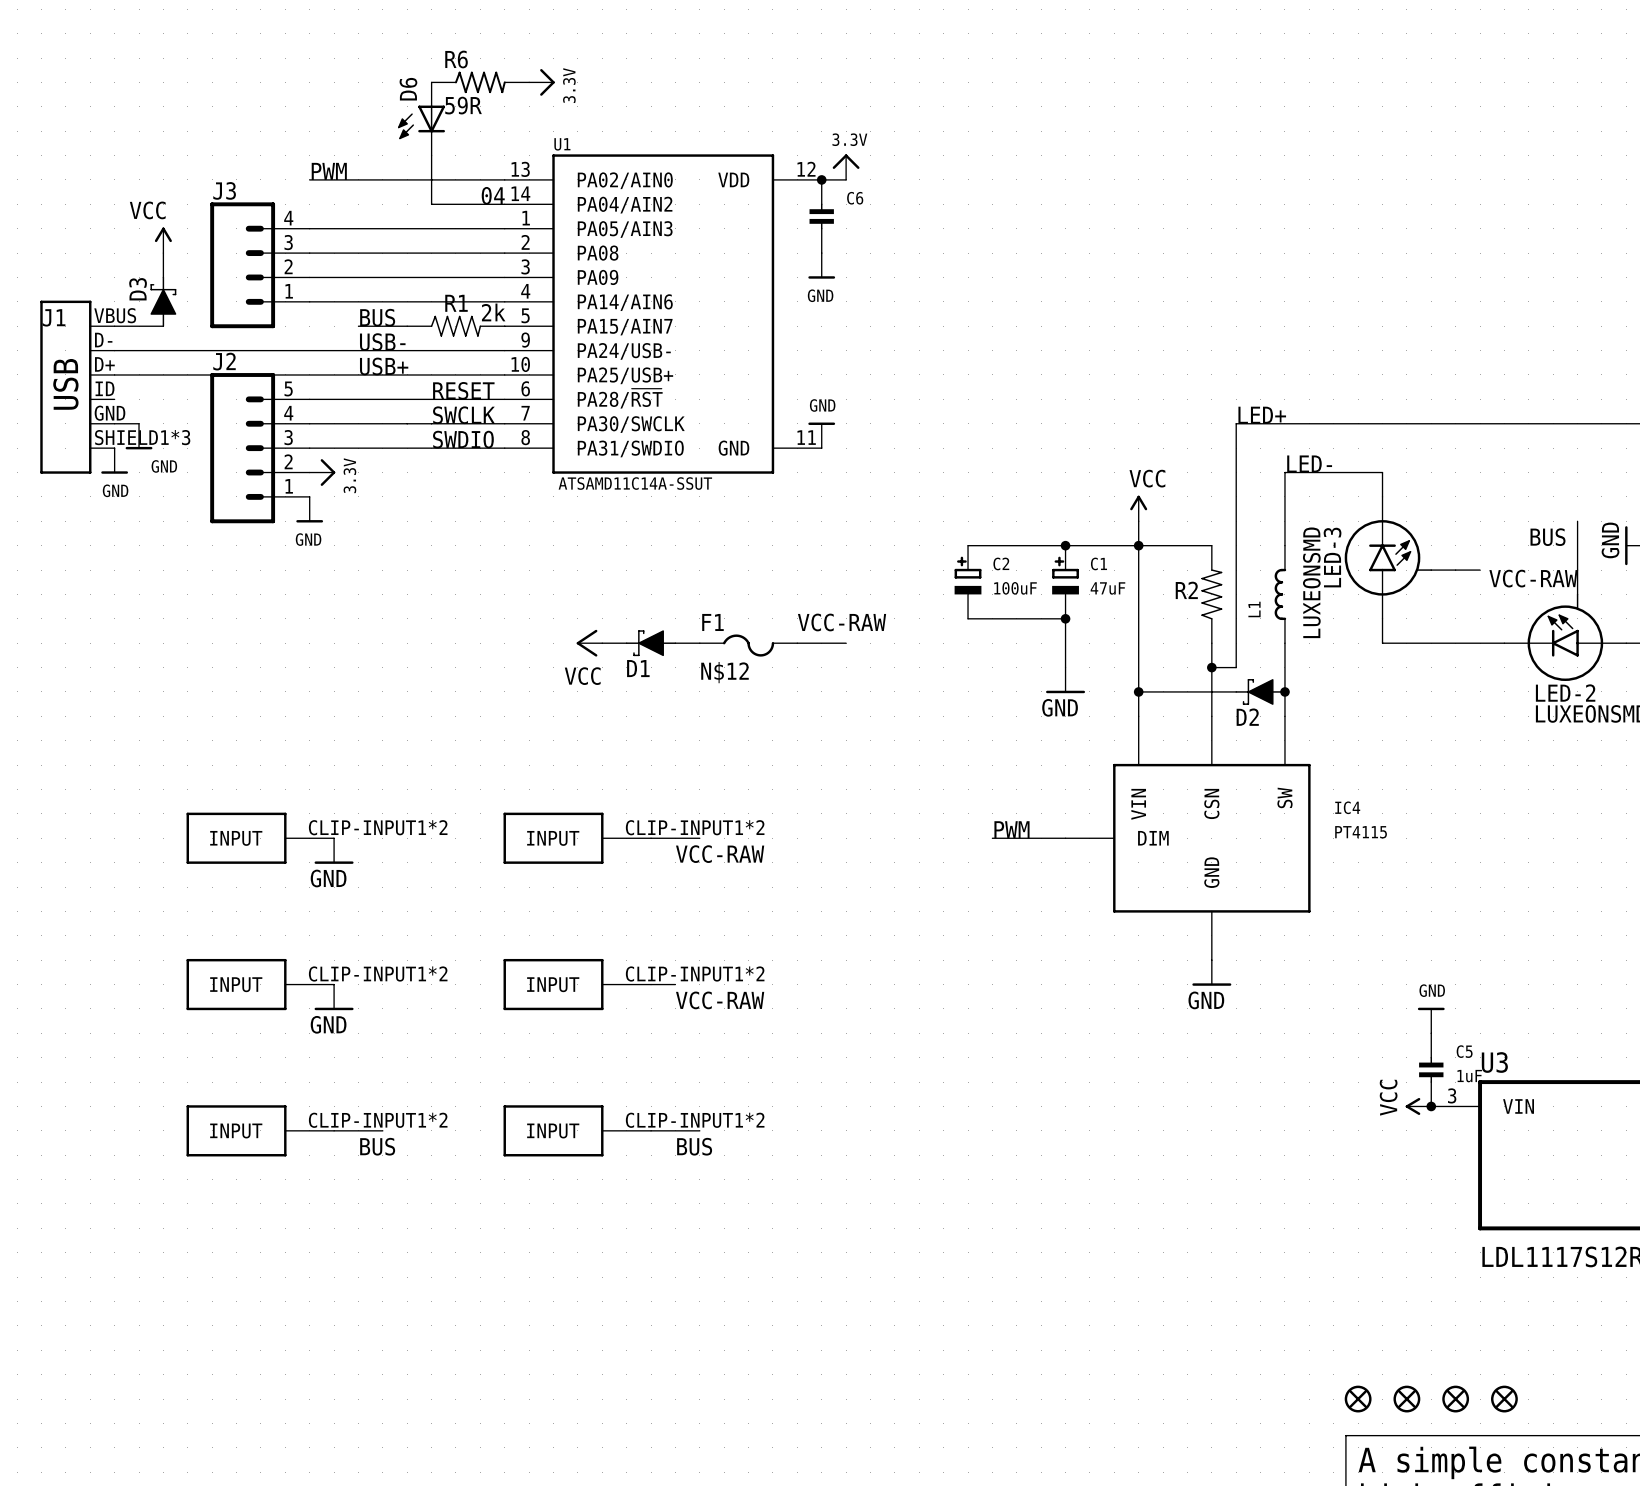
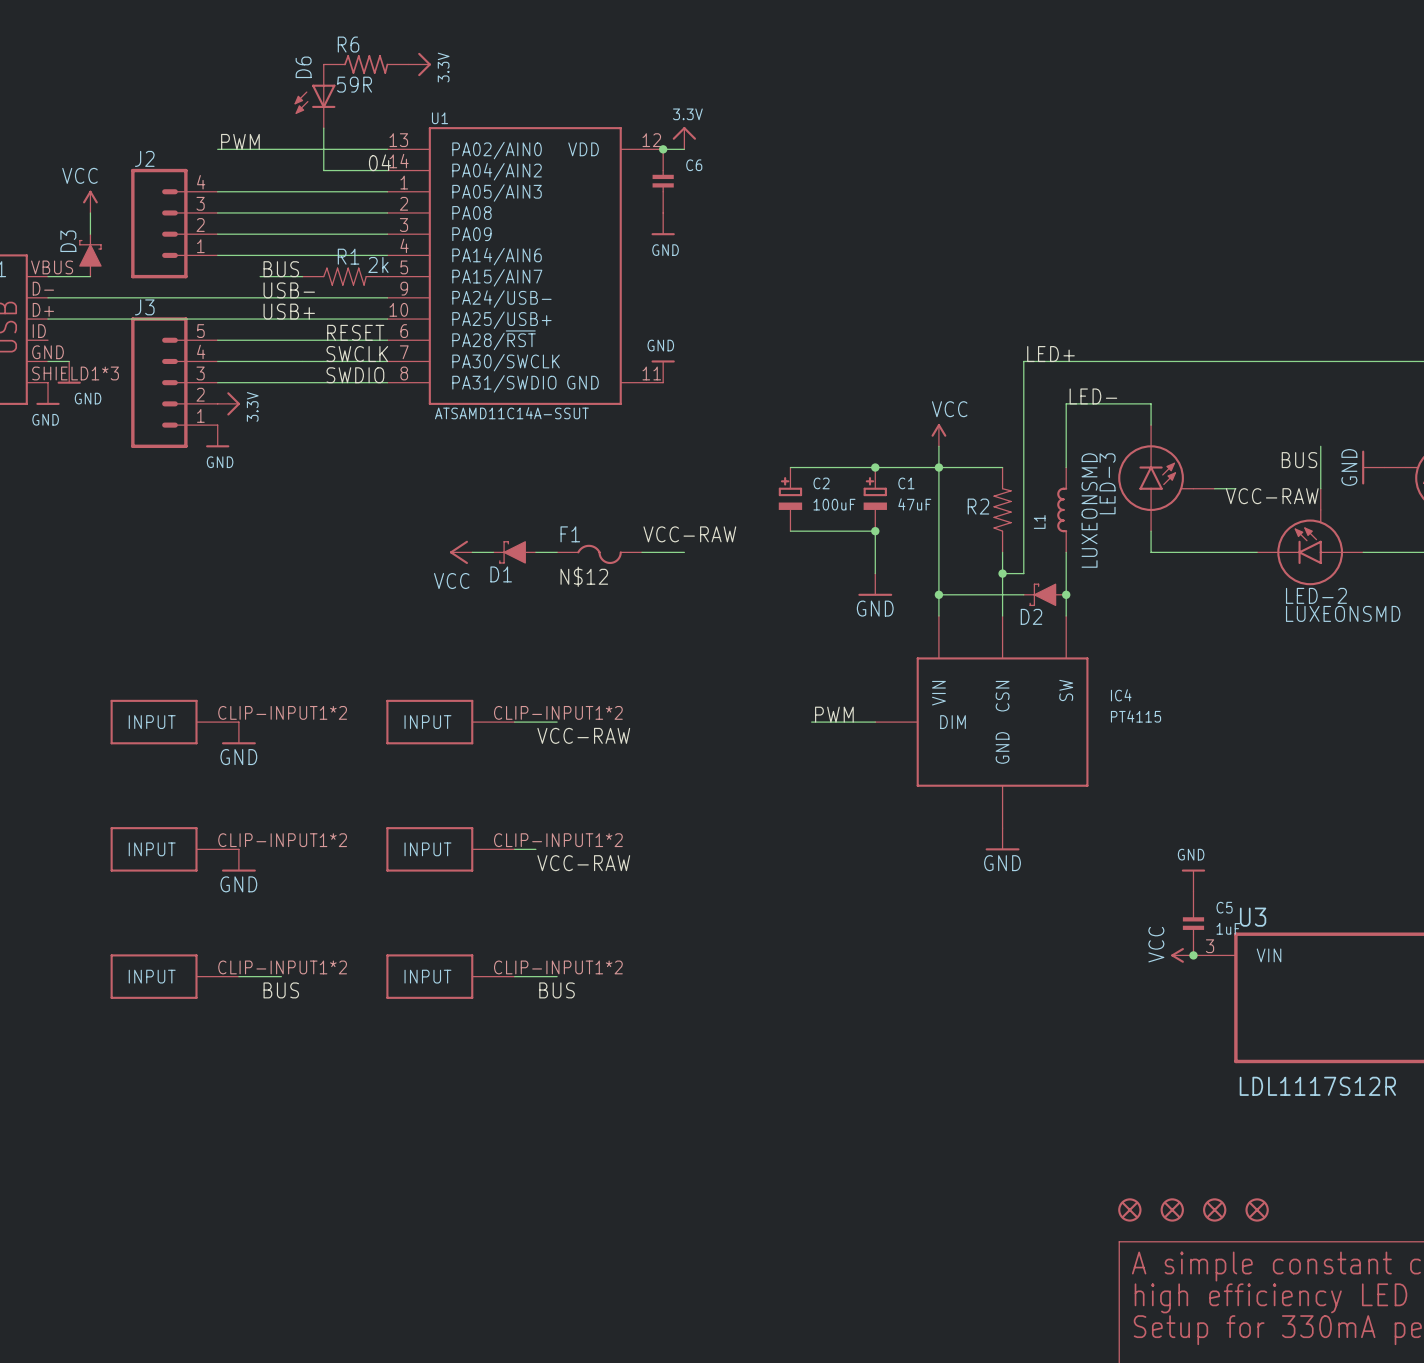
J3 name: J3 (224, 190) -> J2 (144, 158)
J2 name: J2 (224, 361) -> J3 (144, 307)

